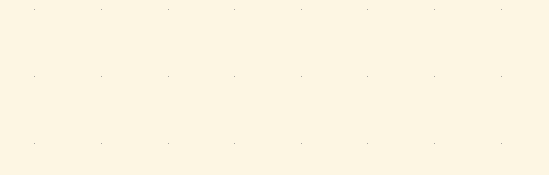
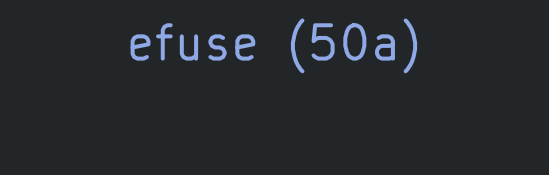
text: none -> efuse (50a) (273, 45)

